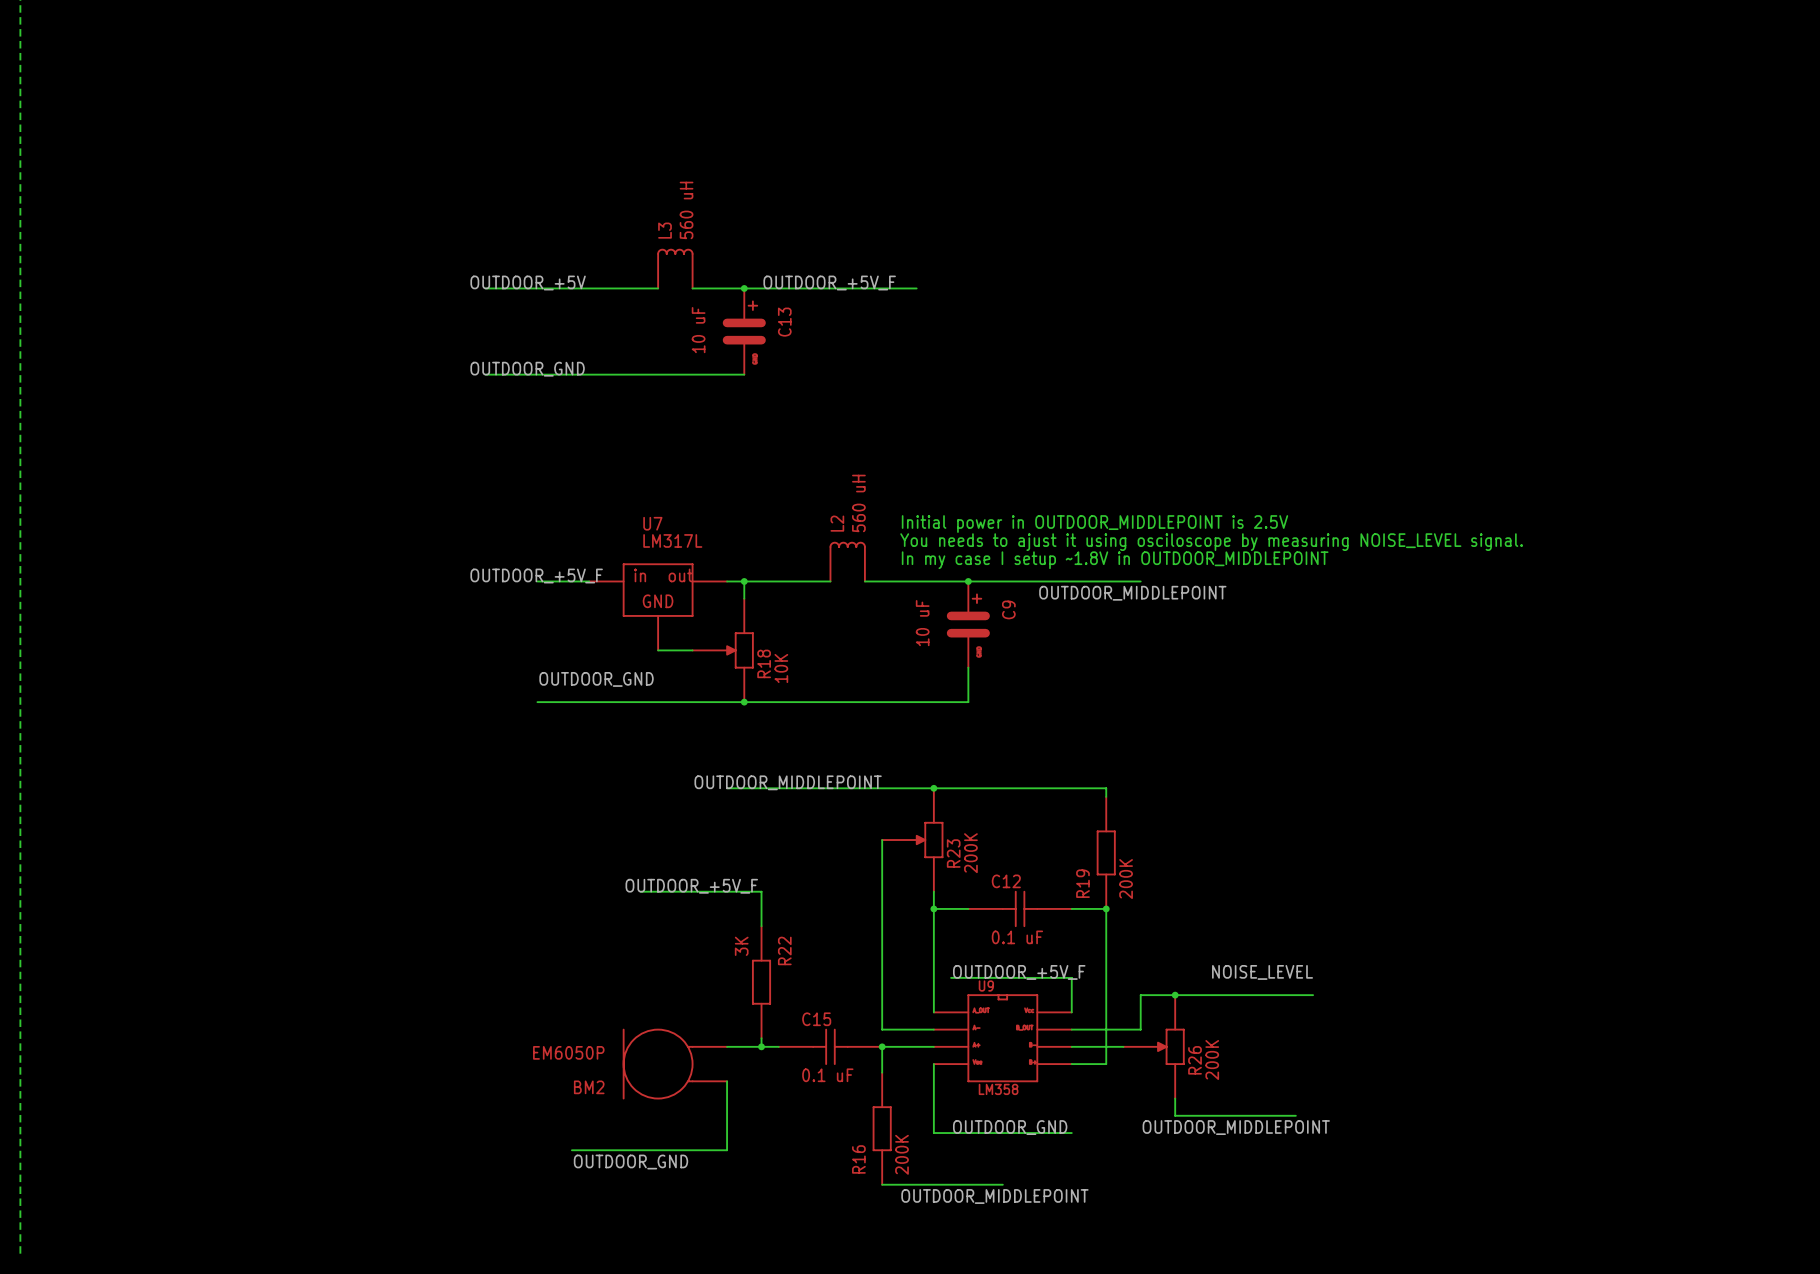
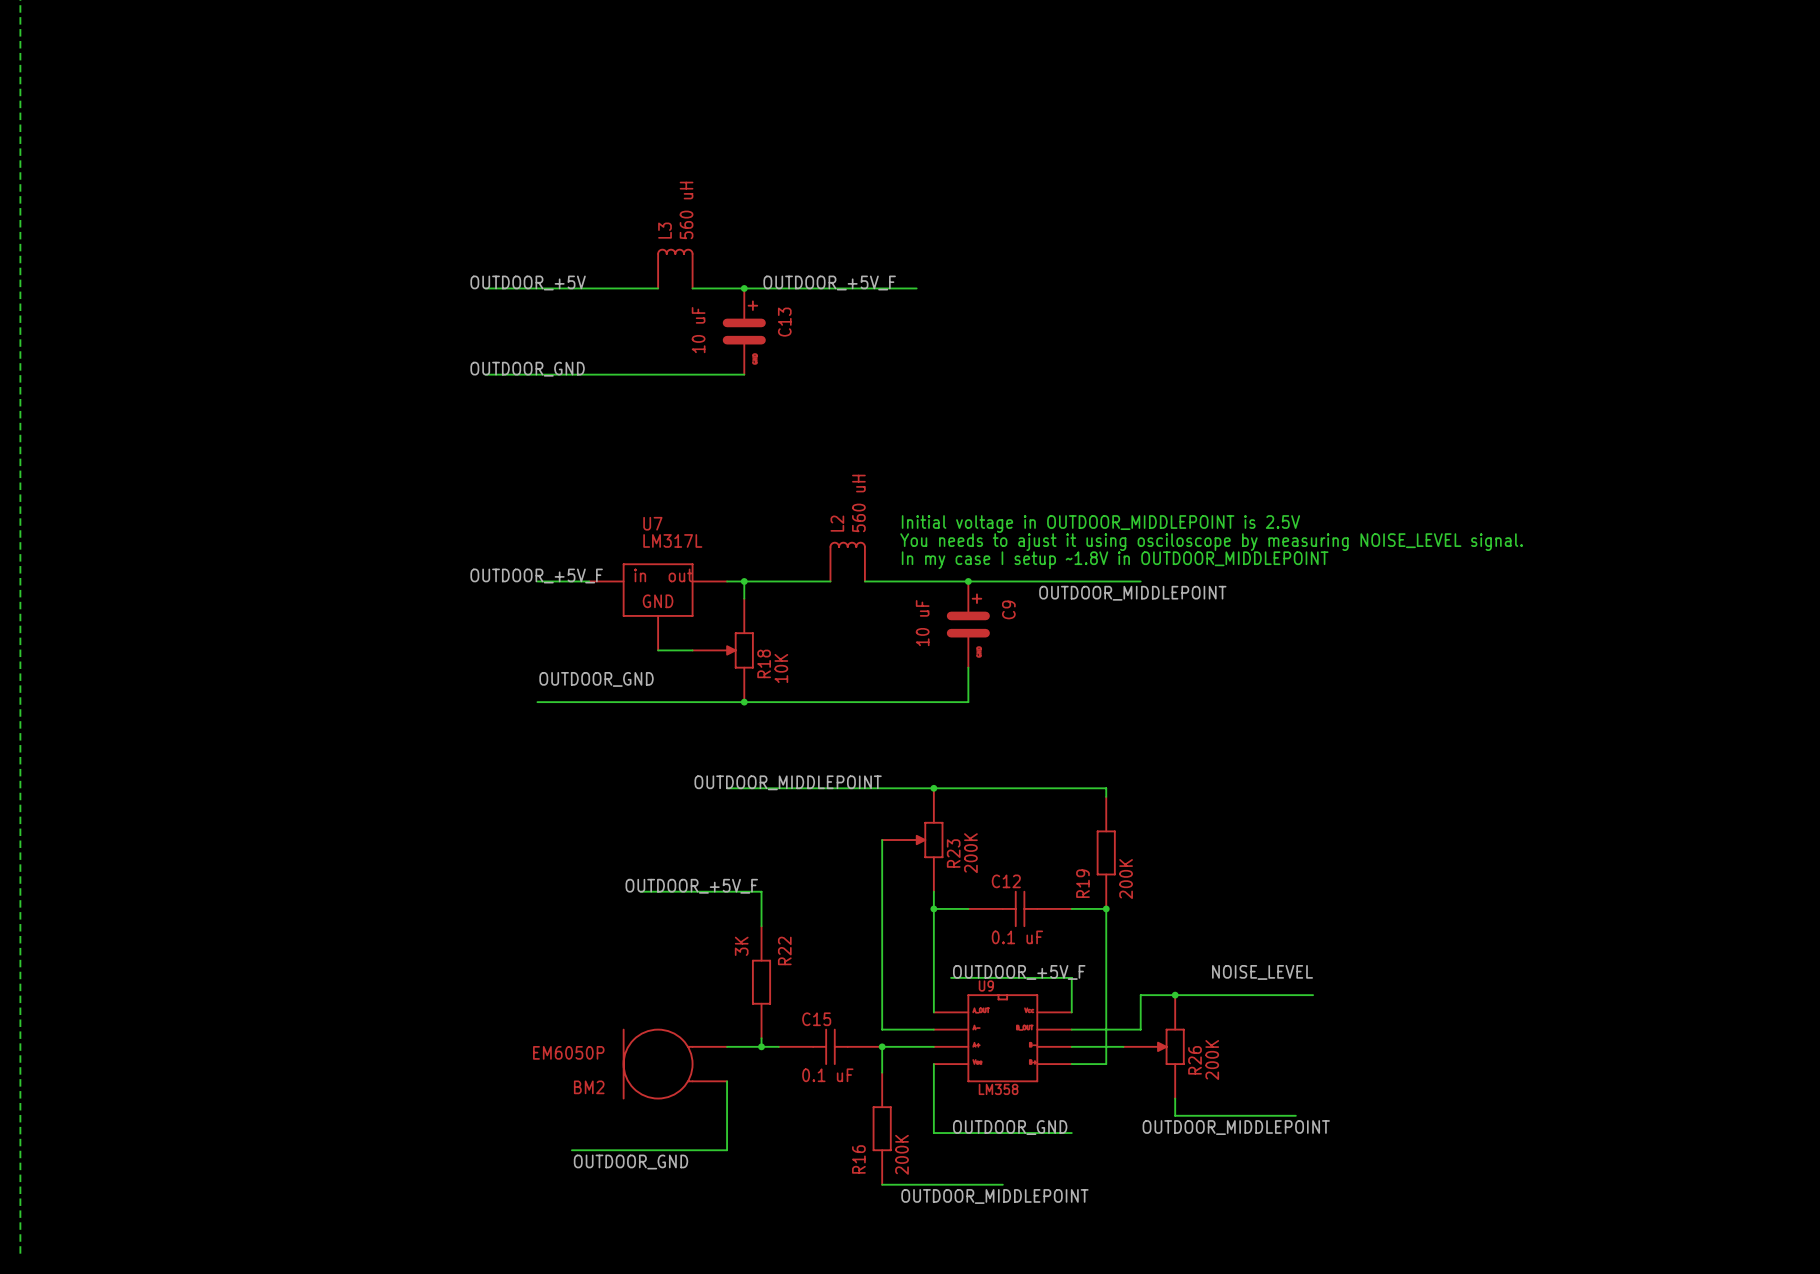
text: Initial power in OUTDOOR_MIDDLEPOINT is 2.5V (1094, 524) -> Initial voltage in OUTDOOR_MIDDLEPOINT is 2.5V (1100, 524)

